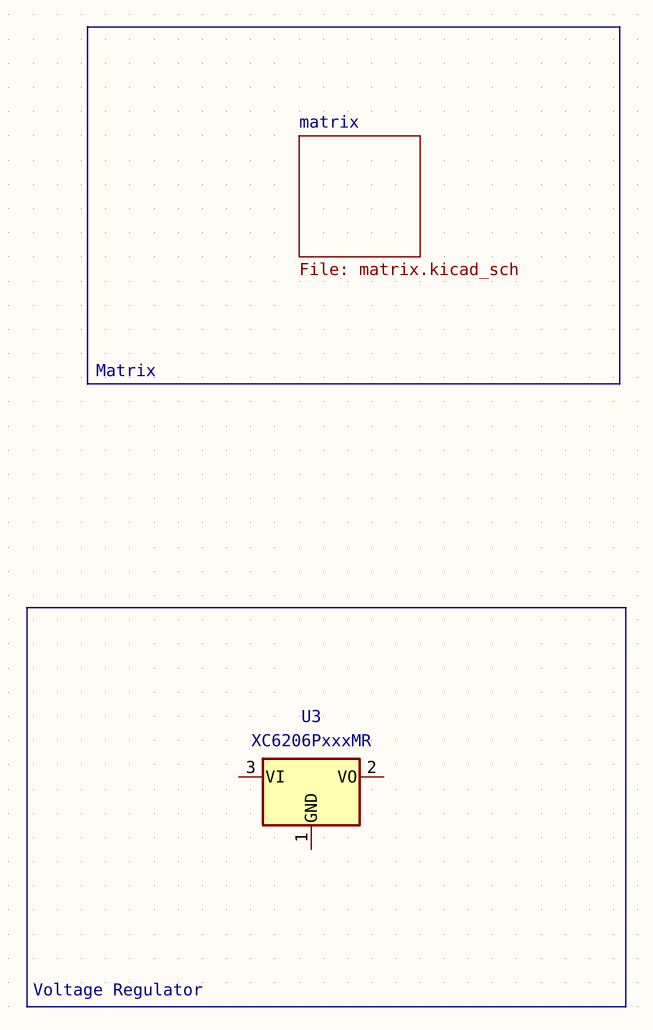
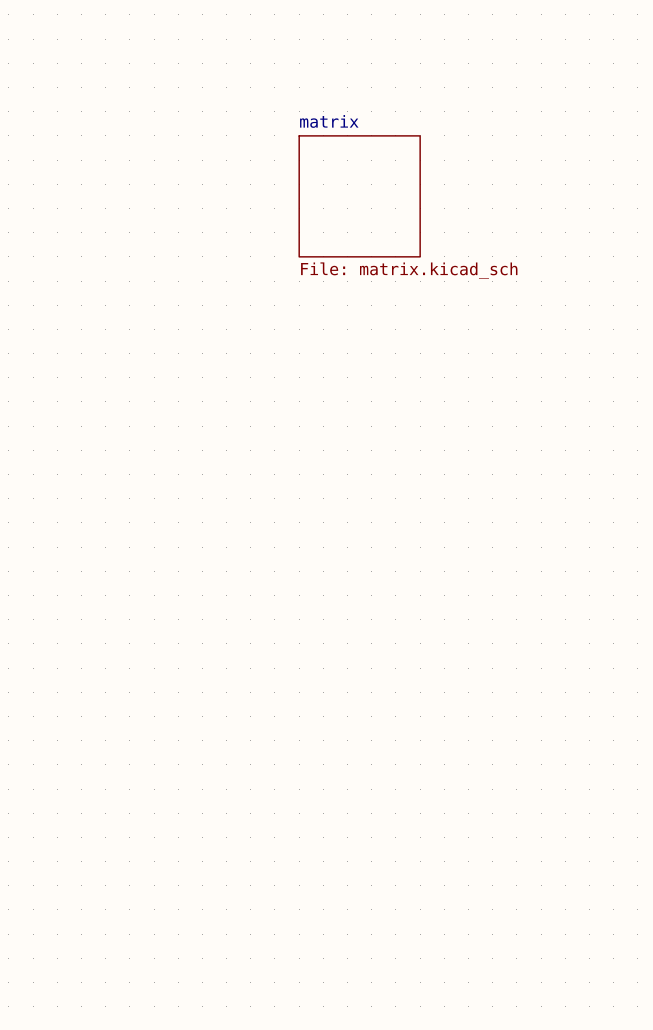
line: (87, 27) (619, 27) (619, 383) (87, 383) (87, 27) -> none
text: Matrix (125, 369) -> none
line: (27, 607) (625, 607) (625, 1006) (27, 1006) (27, 607) -> none
U3: XC6206PxxxMR (311, 803) -> none
text: Voltage Regulator (117, 990) -> none

